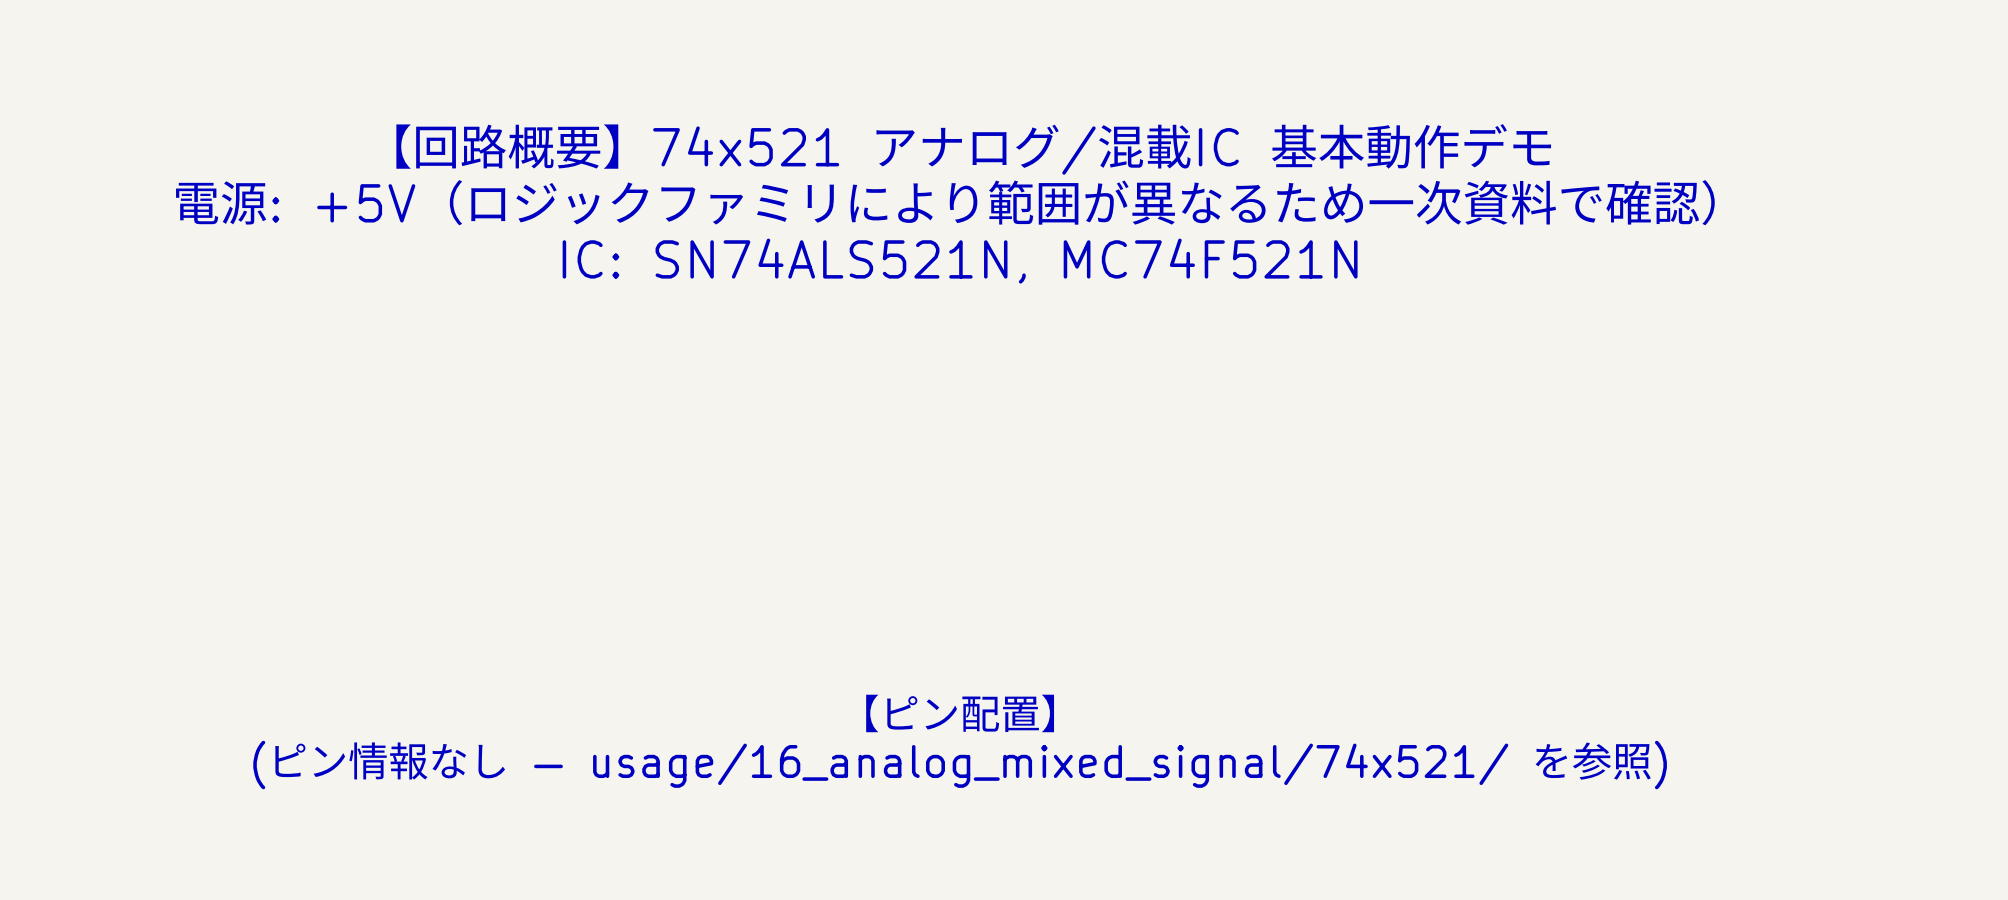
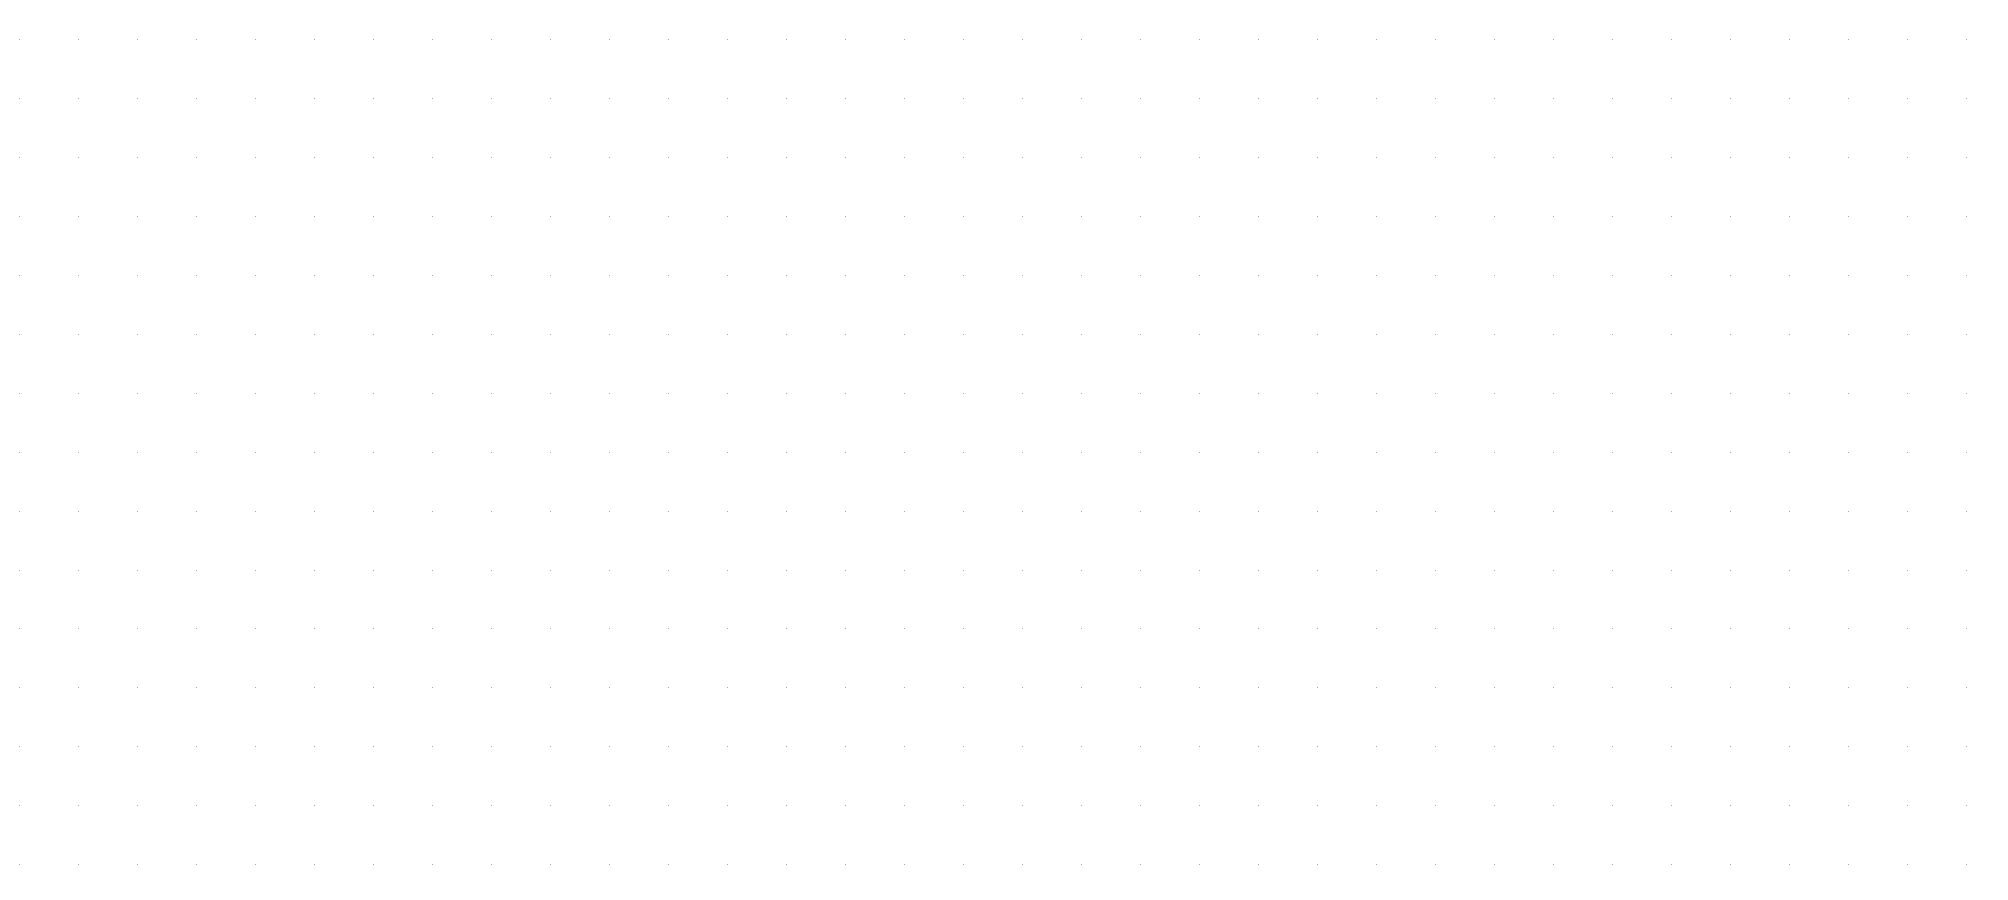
text: 【回路概要】74x521 アナログ/混載IC 基本動作デモ (973, 148) -> none
text: 電源: +5V（ロジックファミリにより範囲が異なるため一次資料で確認） (945, 202) -> none
text: IC: SN74ALS521N, MC74F521N (960, 261) -> none
text: 【ピン配置】 (960, 713) -> none
text: (ピン情報なし — usage/16_analog_mixed_signal/74x521/ を参照) (960, 764) -> none

